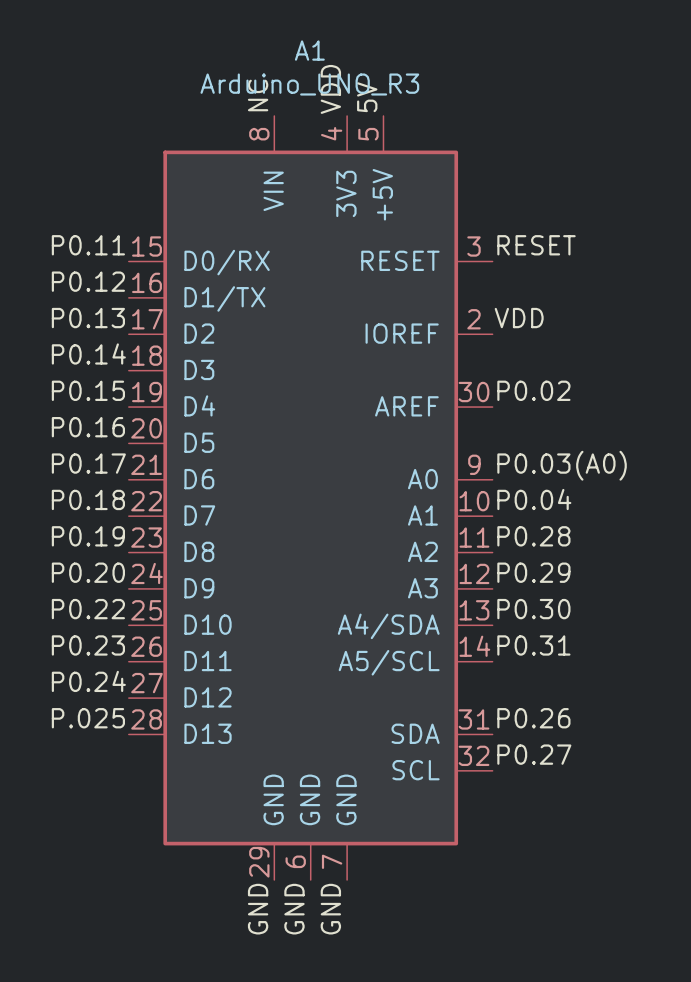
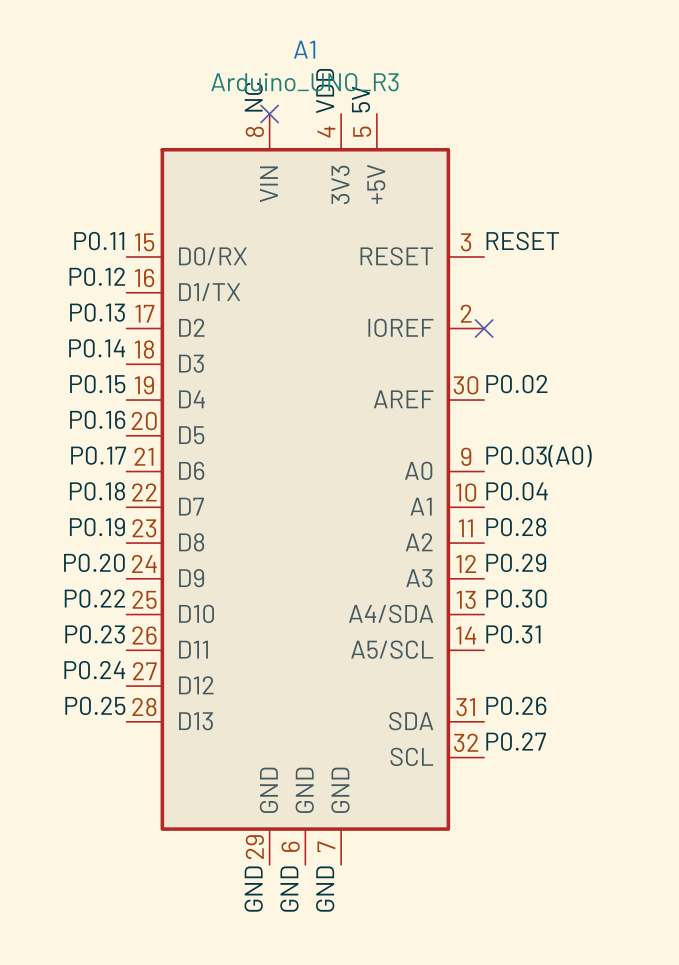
no-connect mark: none -> (269, 113)
label: VDD (519, 318) -> none
no-connect mark: none -> (484, 328)
label: P.025 (88, 718) -> P0.25 (95, 705)

